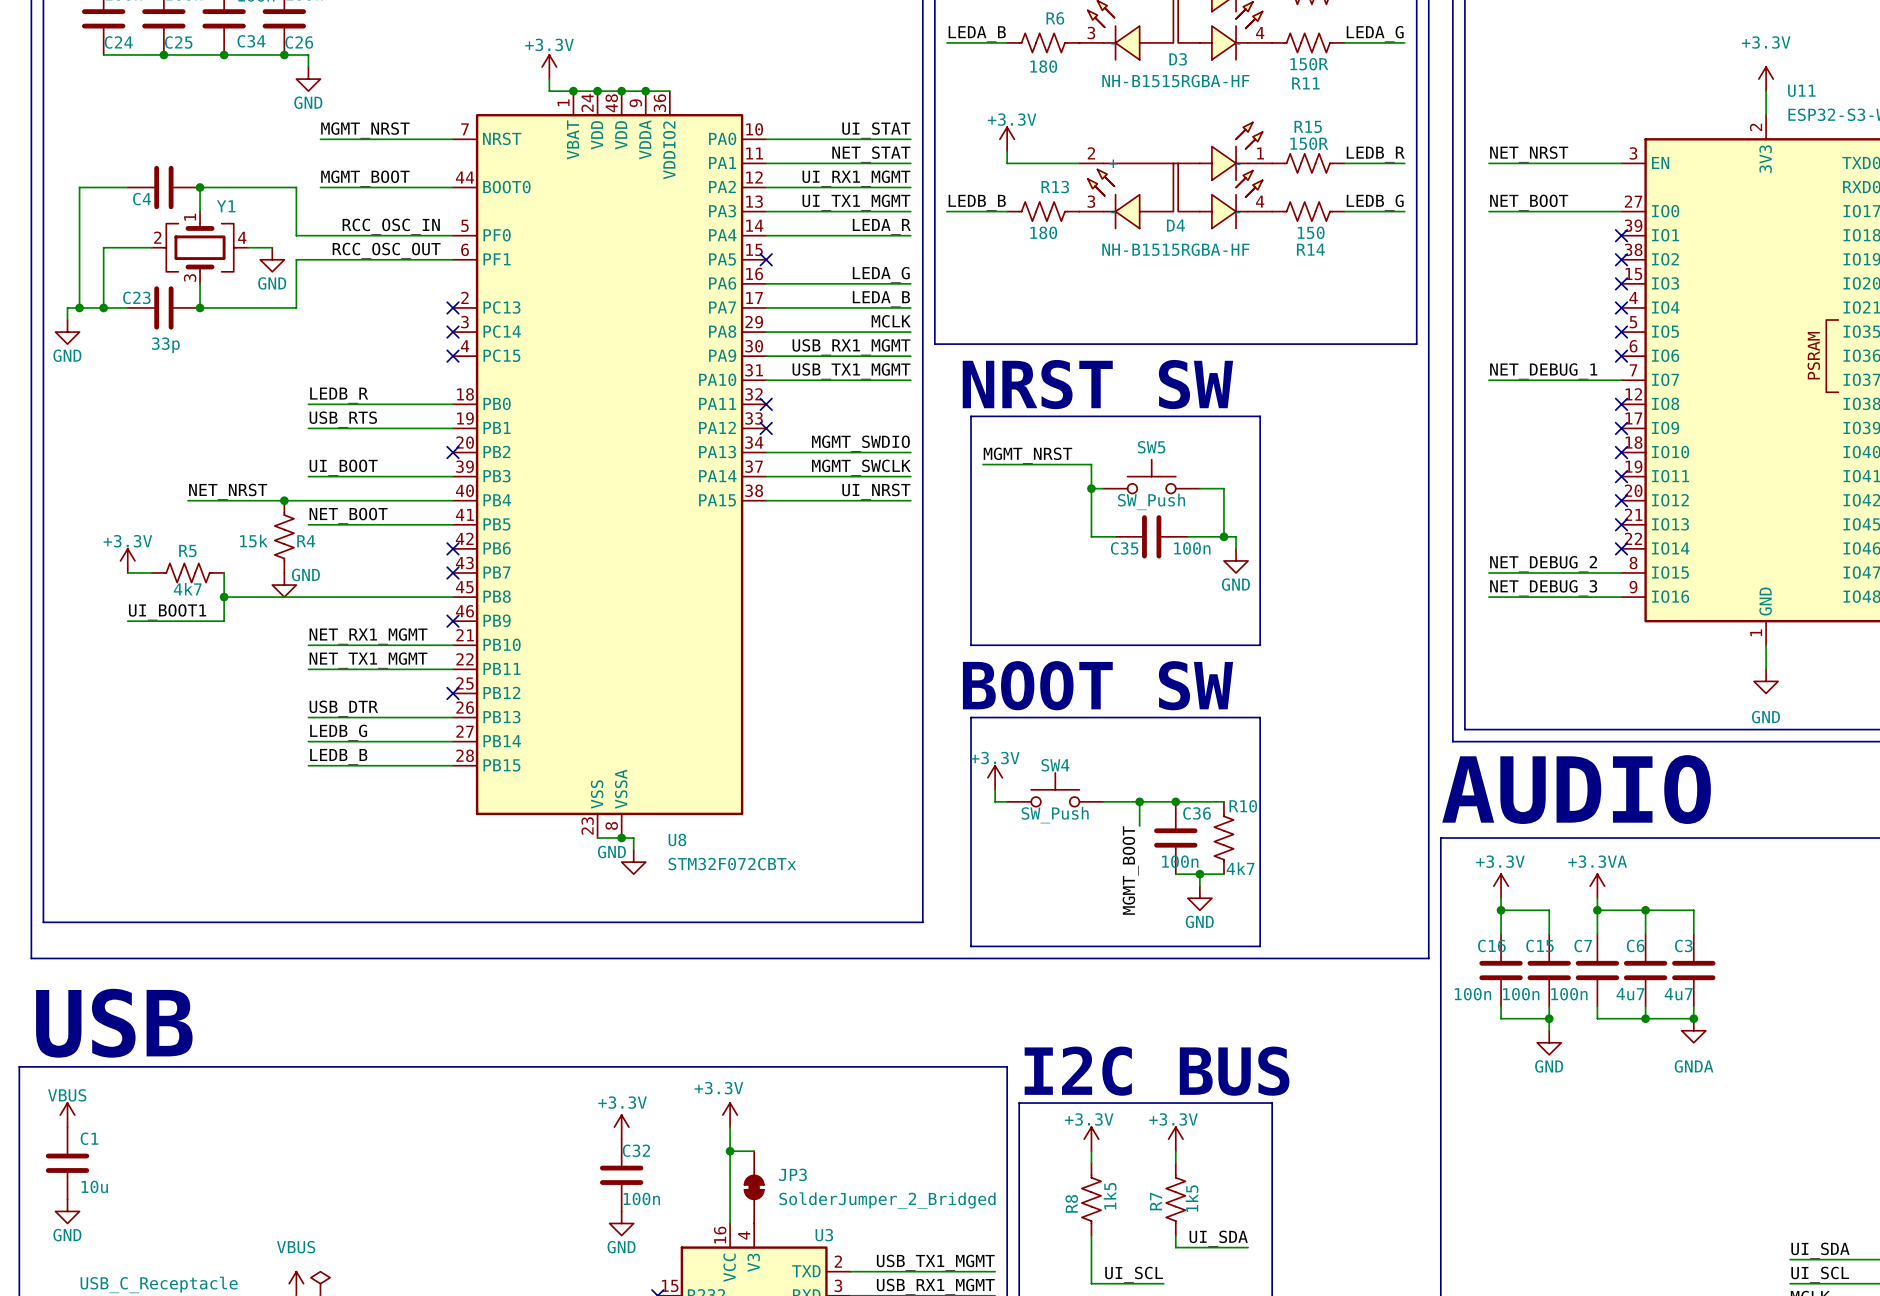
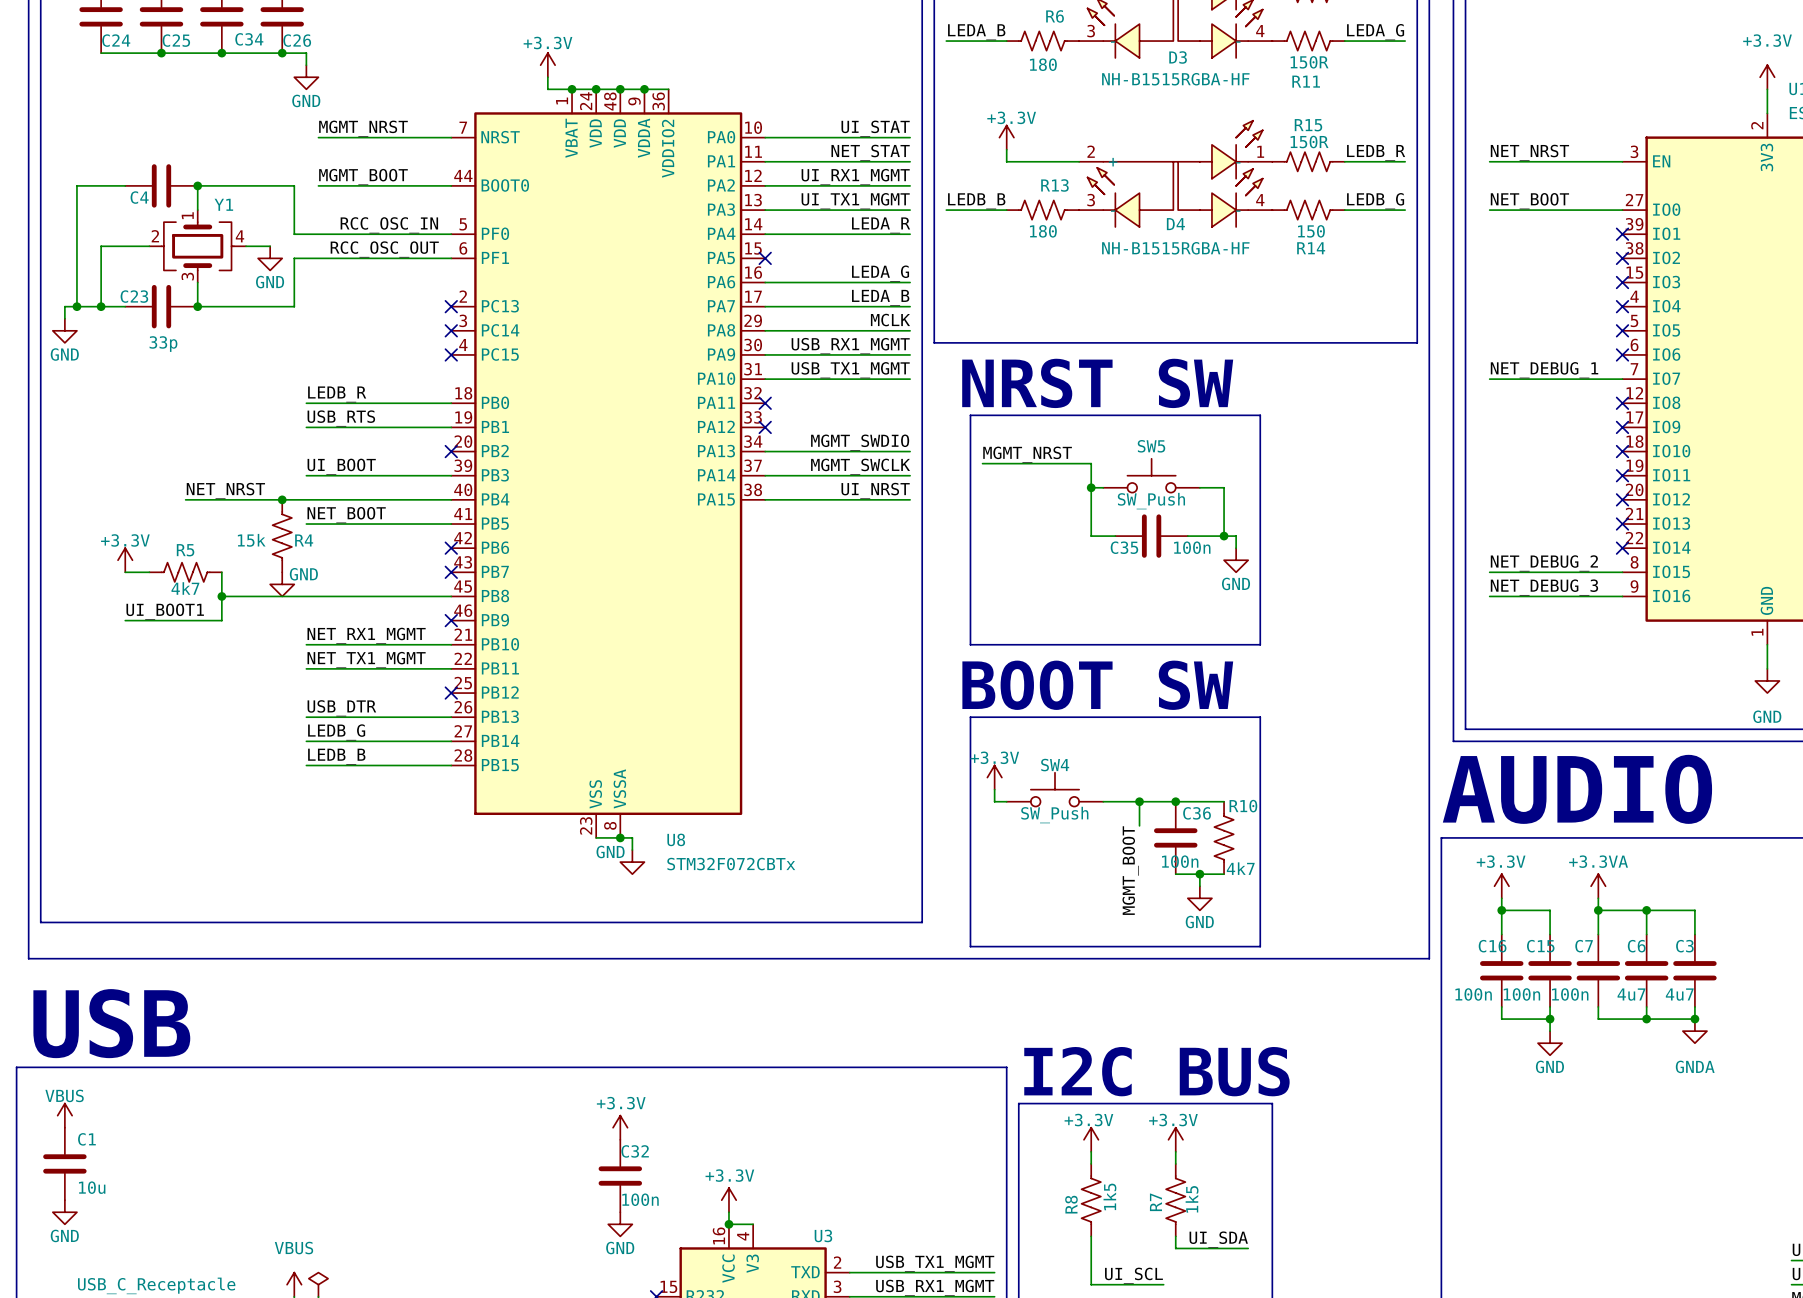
power symbol text position: +3.3V (718, 1088) -> +3.3V (729, 1175)
power symbol position: +3.3V (730, 1115) -> +3.3V (728, 1200)
wire: (730, 1127) (730, 1211) -> none
wire: (730, 1151) (754, 1151) -> (728, 1224) (753, 1224)
junction: (730, 1151) -> none
JP3: SolderJumper_2_Bridged (754, 1187) -> none
junction: none -> (728, 1224)

